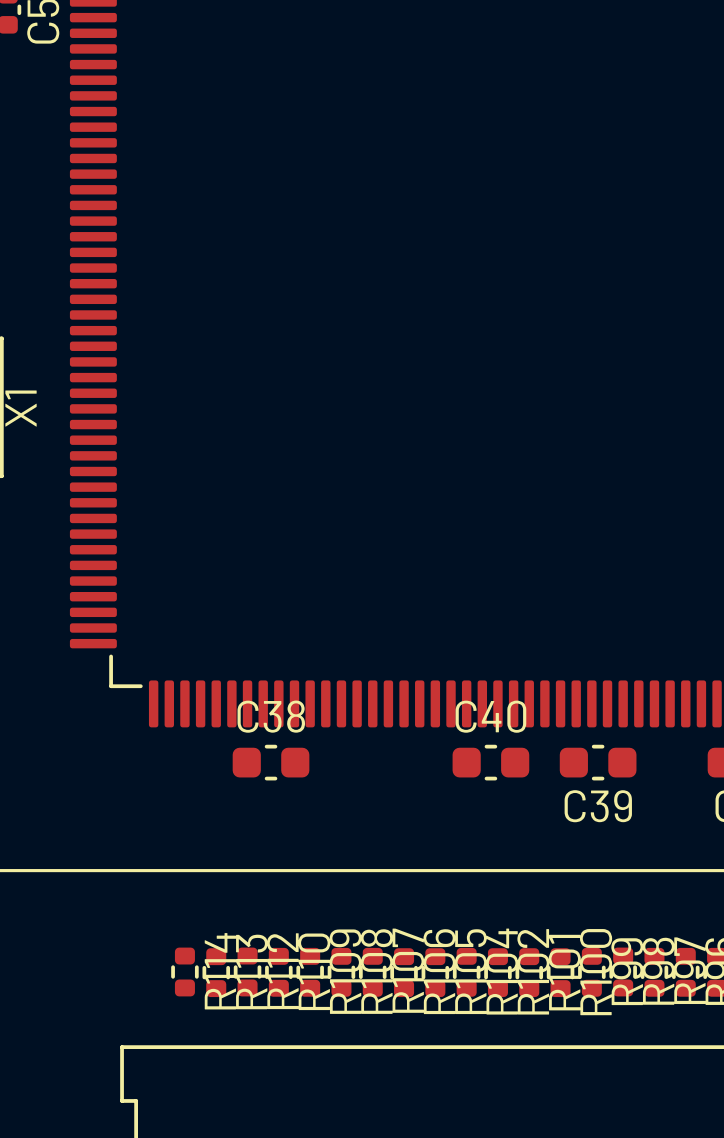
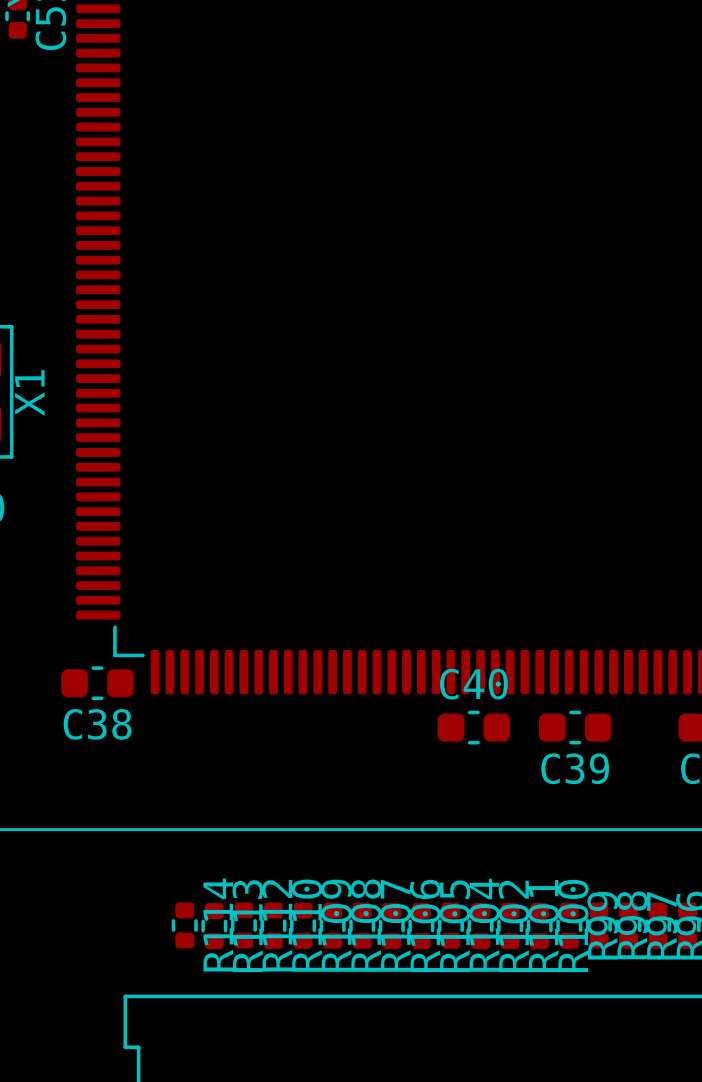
C38 name position: C38 (271, 716) -> C38 (97, 724)
C38 position: (271, 762) -> (97, 683)

